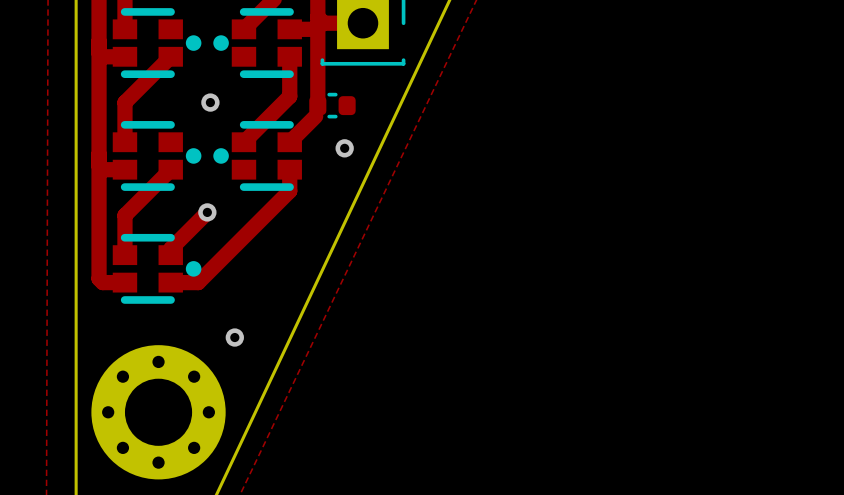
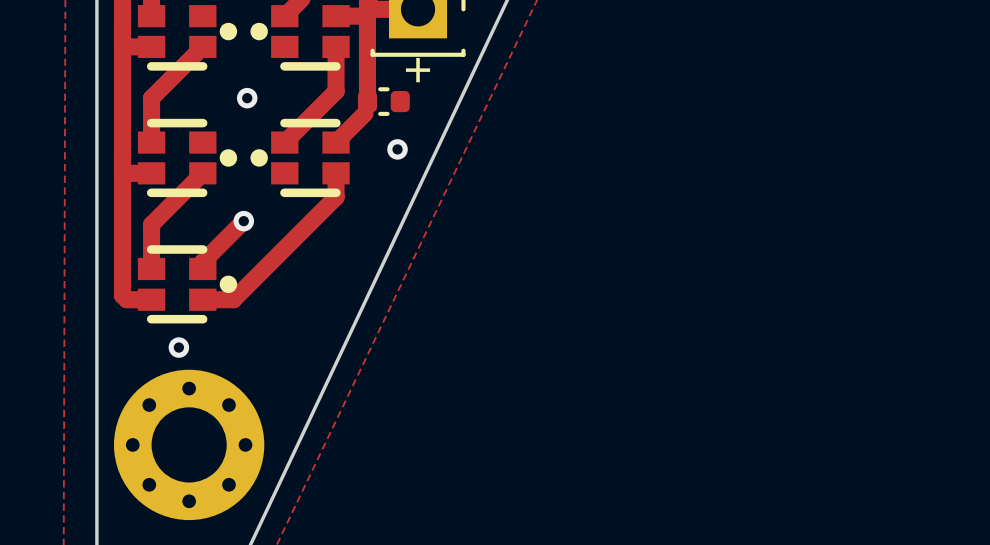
part name: none -> + (418, 70)
via position: (234, 337) -> (178, 347)

